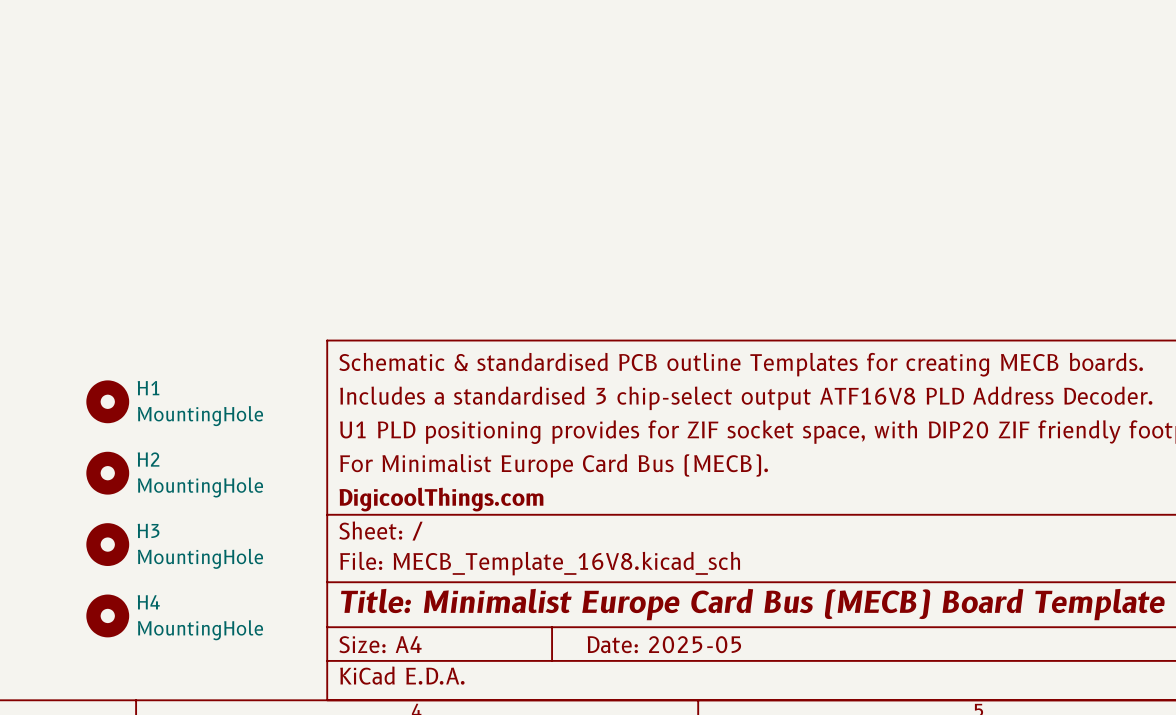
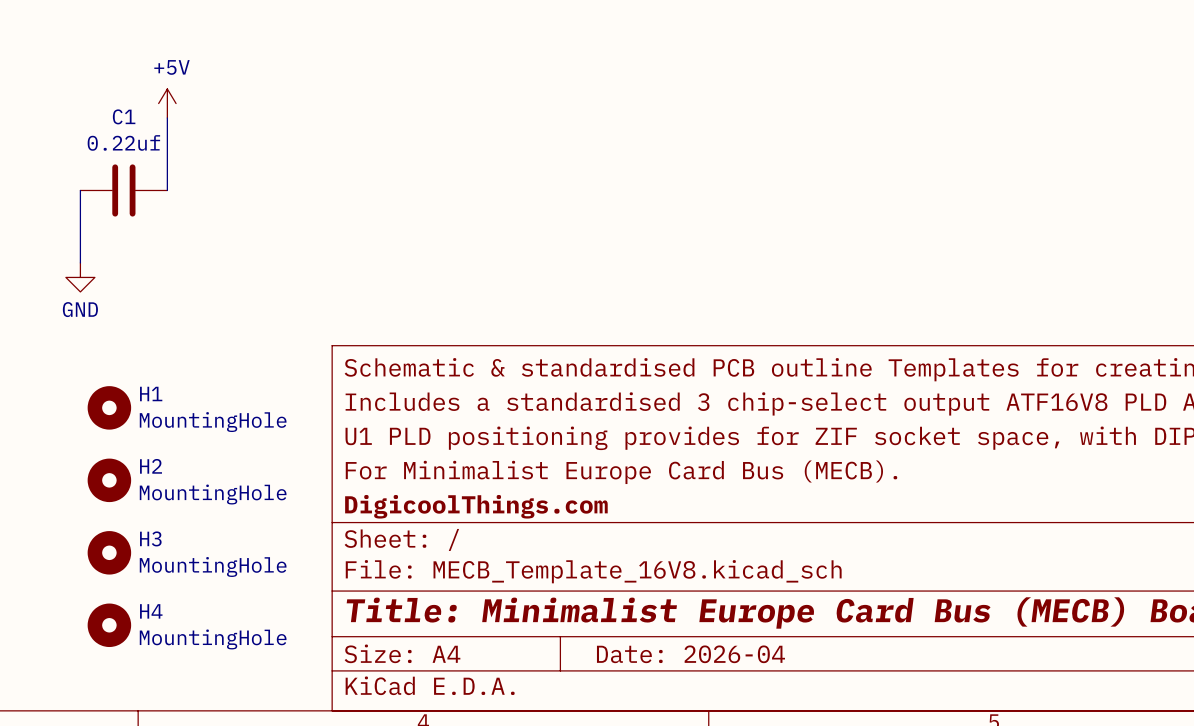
power symbol: none -> +5V (167, 103)
wire: none -> (167, 118) (167, 190)
wire: none -> (80, 190) (80, 262)
C1: none -> 0.22uf (123, 190)
power symbol: none -> GND (80, 277)
title block: Date: 2025-05 (664, 644) -> Date: 2026-04 (690, 654)

